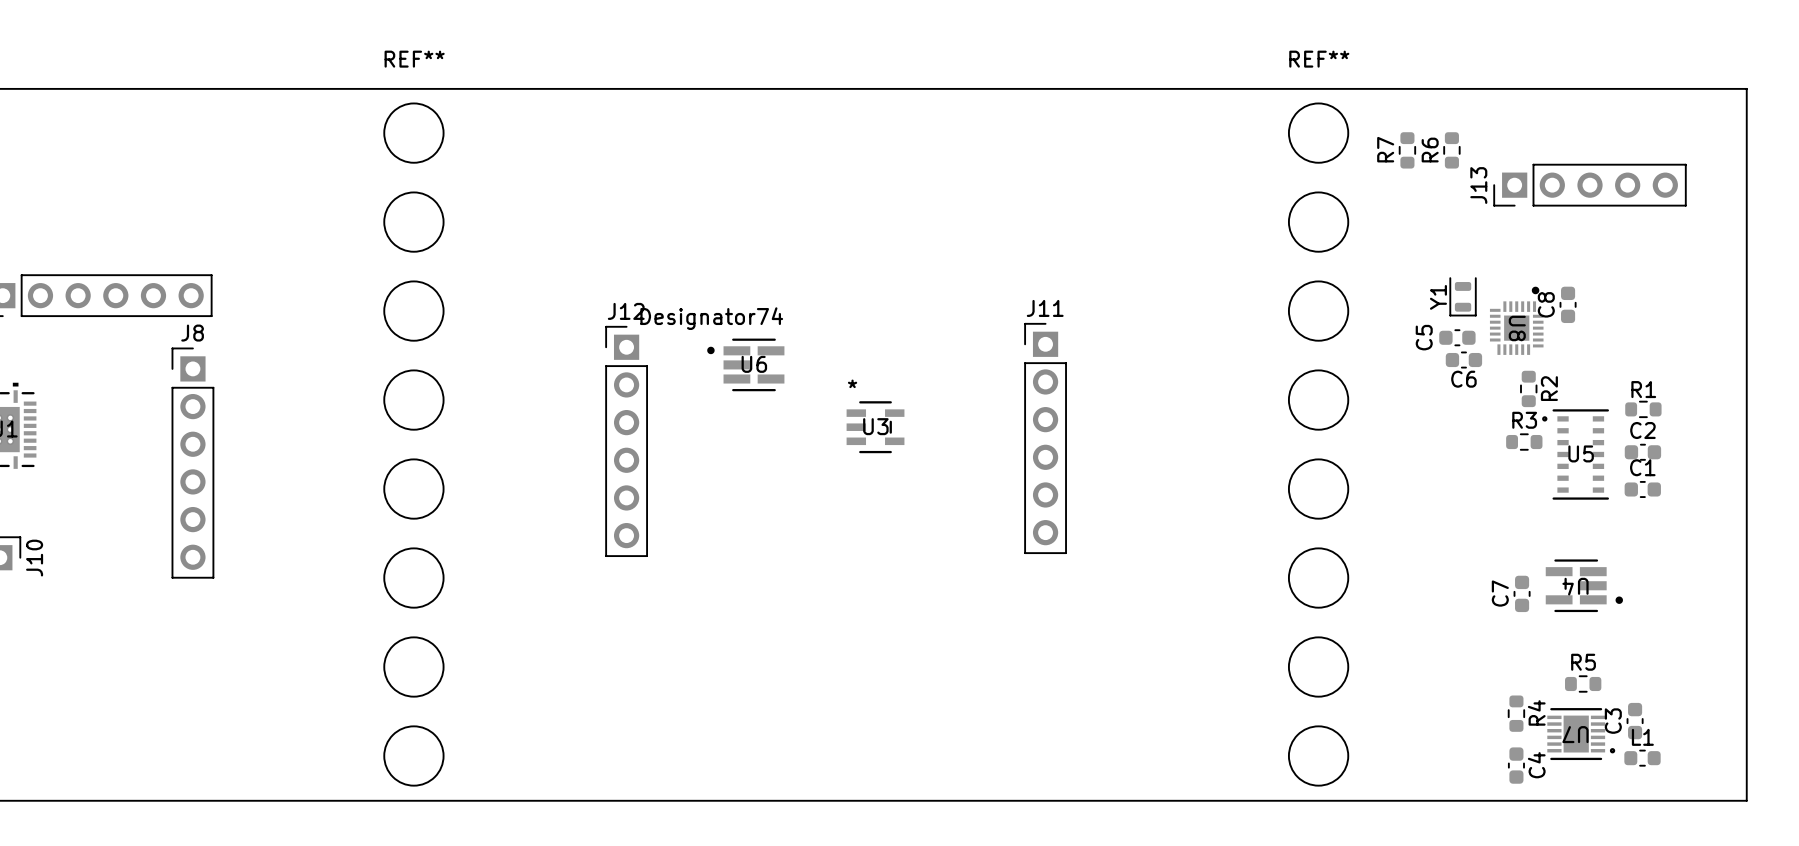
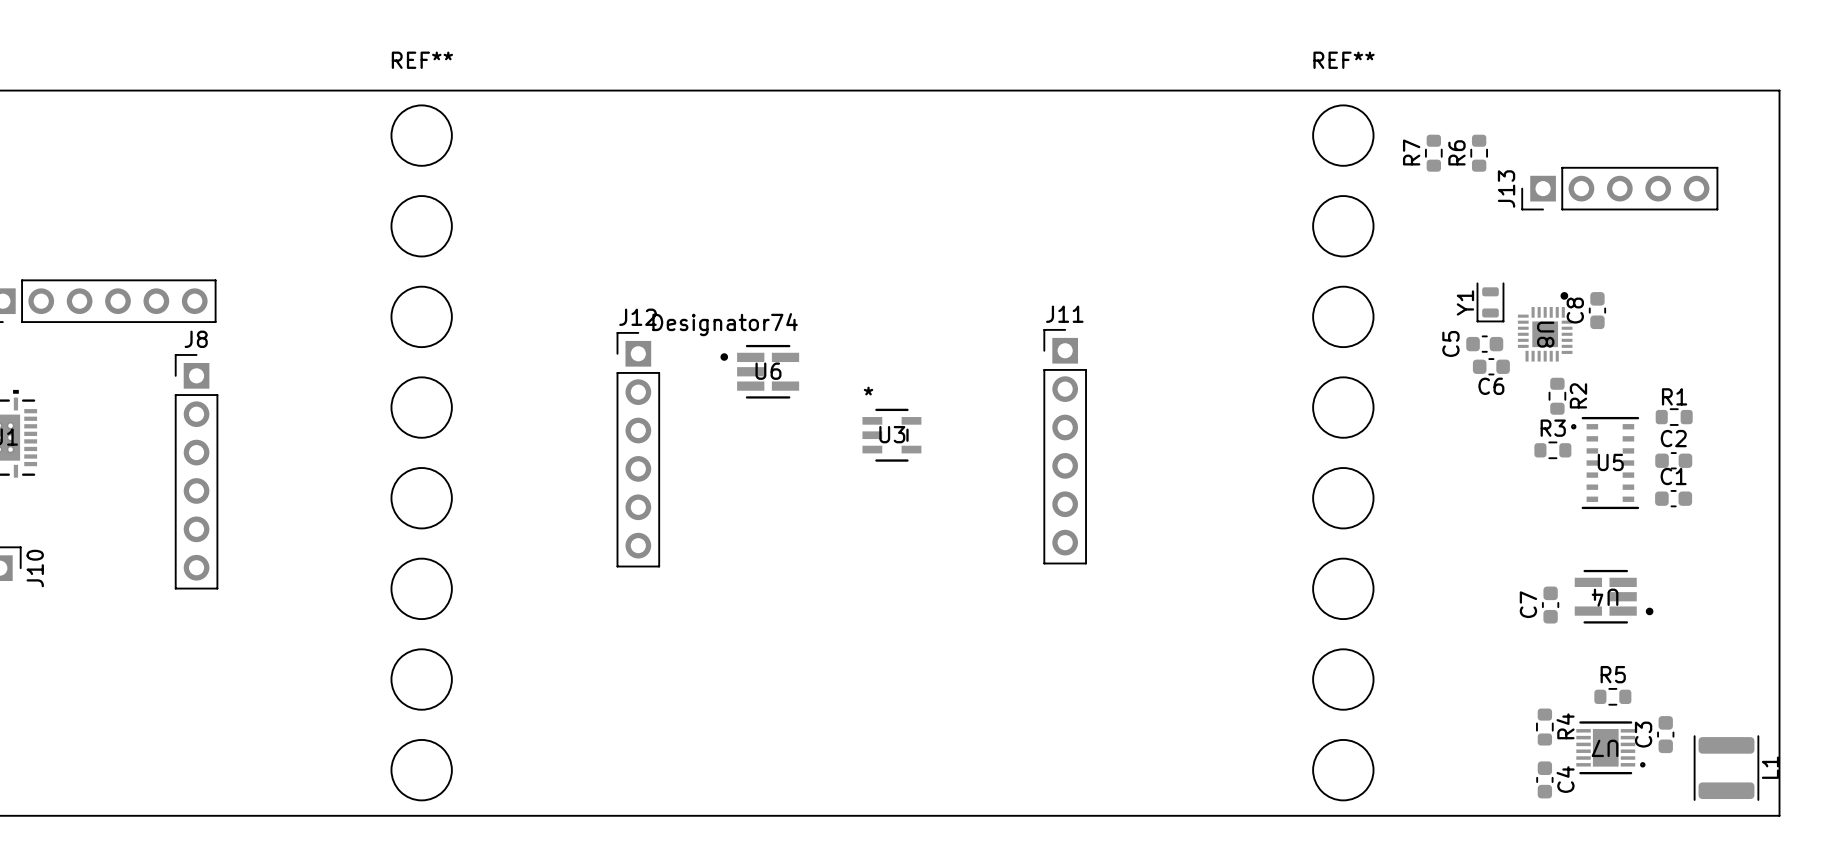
L1 name position: L1 (1642, 737) -> L1 (1770, 767)
L1 footprint: [1624, 749, 1661, 767] -> [1693, 735, 1760, 801]

